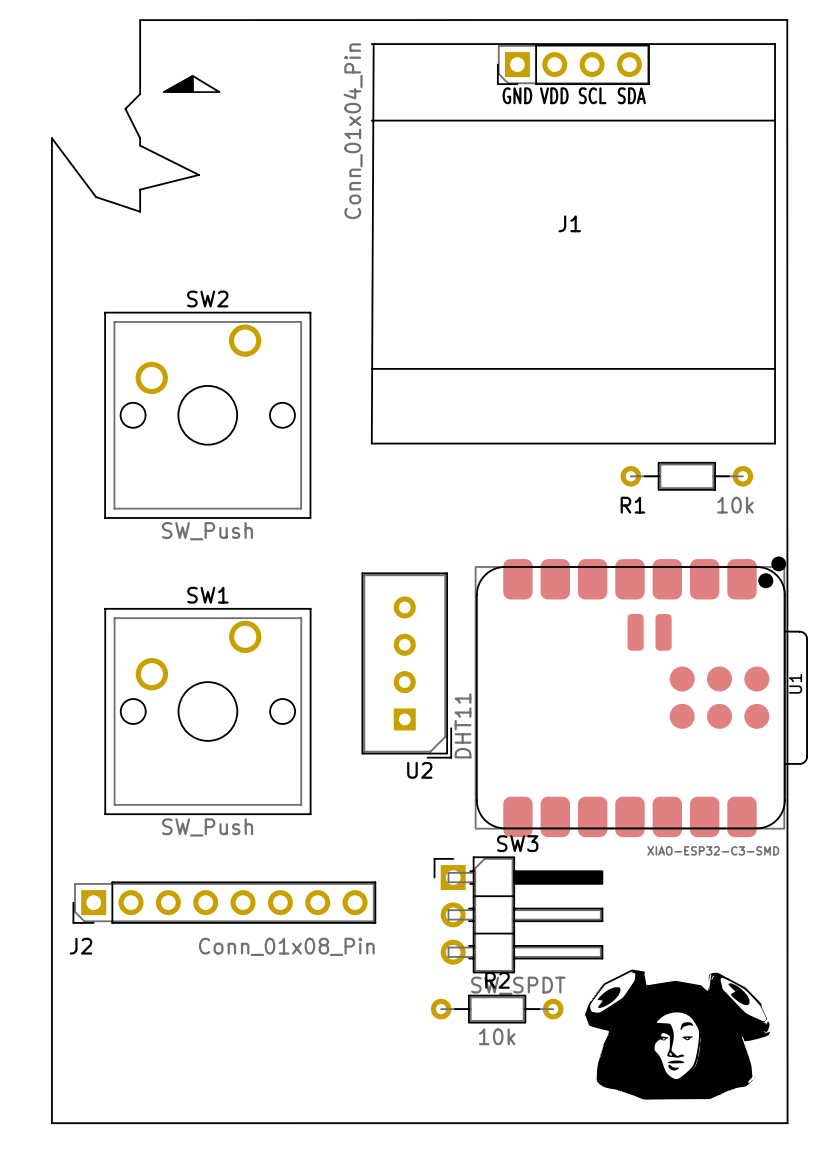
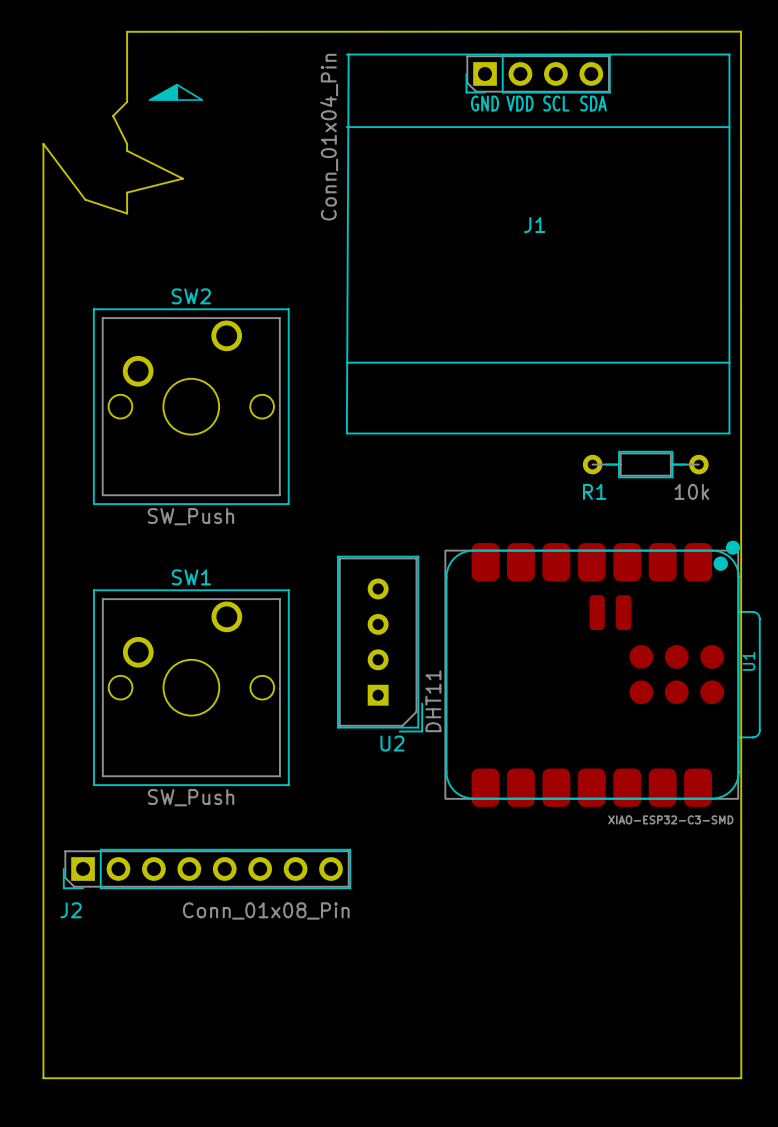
SW3: SW_SPDT (518, 914) -> none
drawing: [584, 969, 771, 1100] -> none
R2: 10k (497, 1009) -> none

